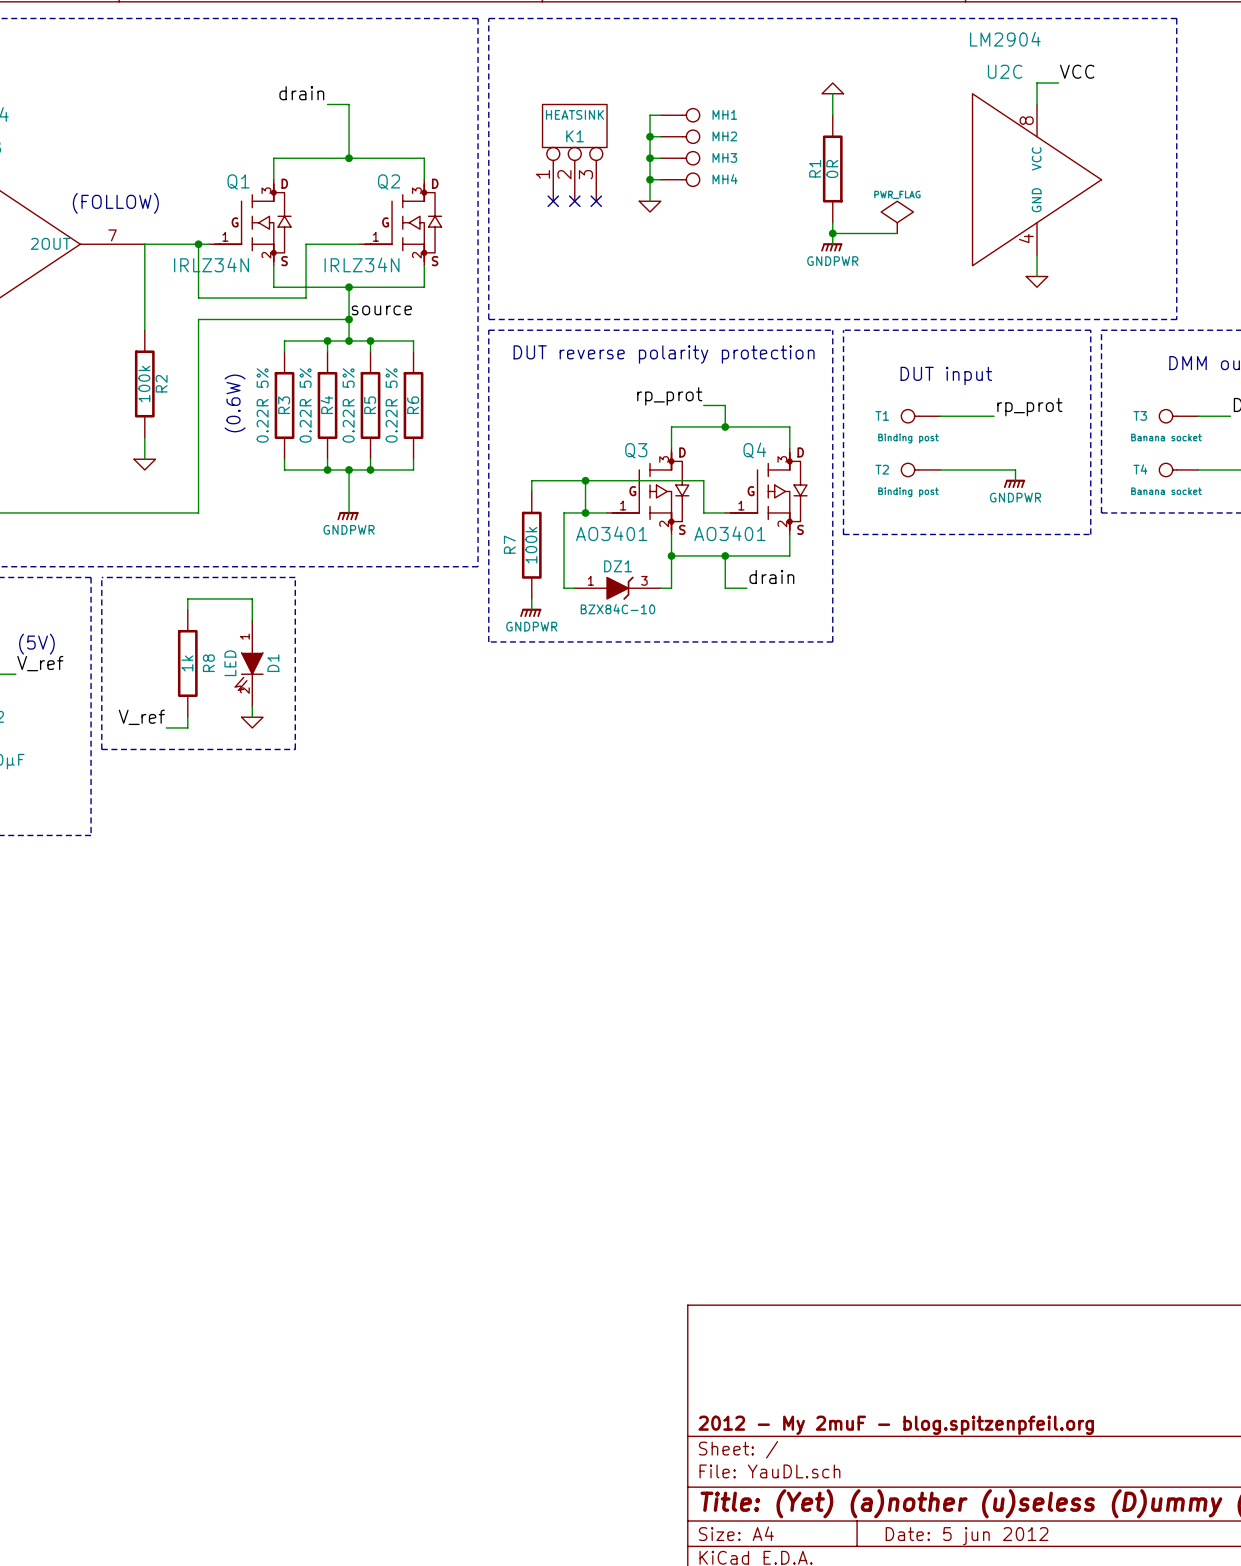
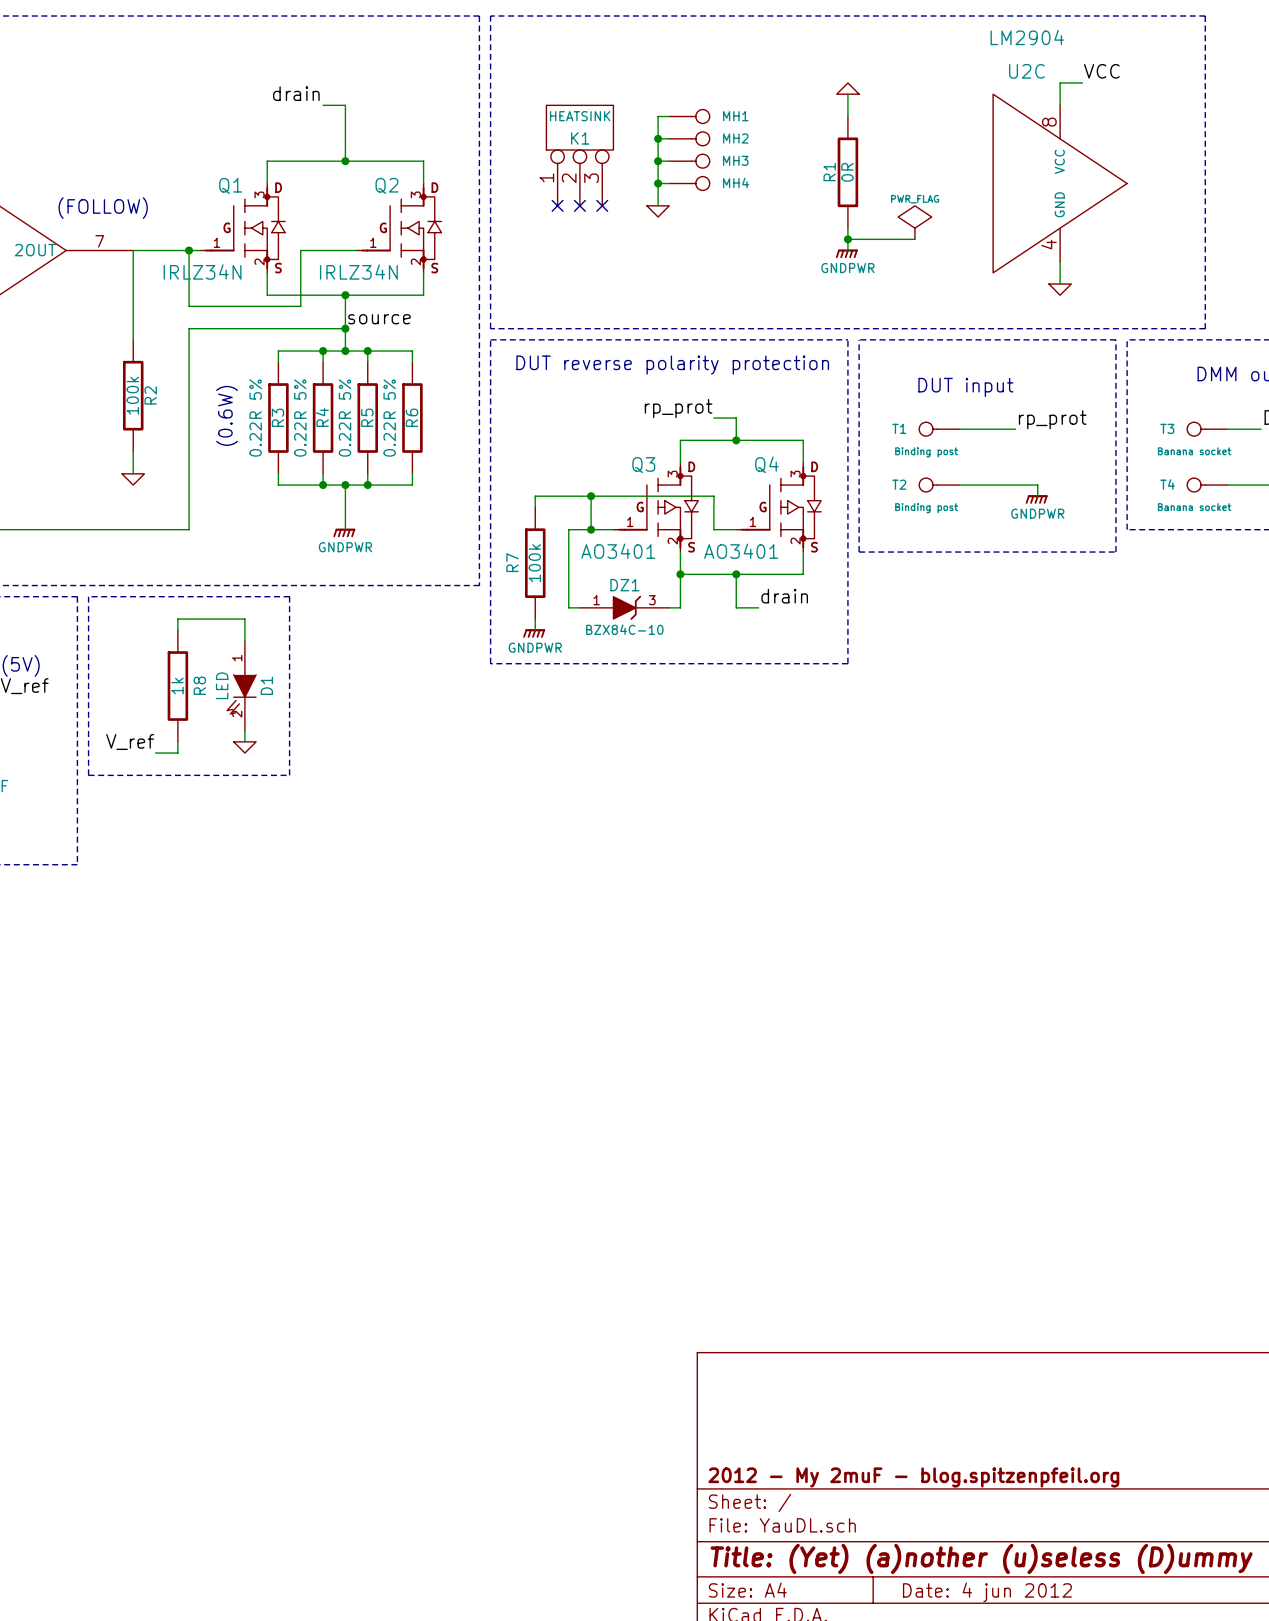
title block: Date: 5 jun 2012 (967, 1536) -> Date: 4 jun 2012 (987, 1592)

